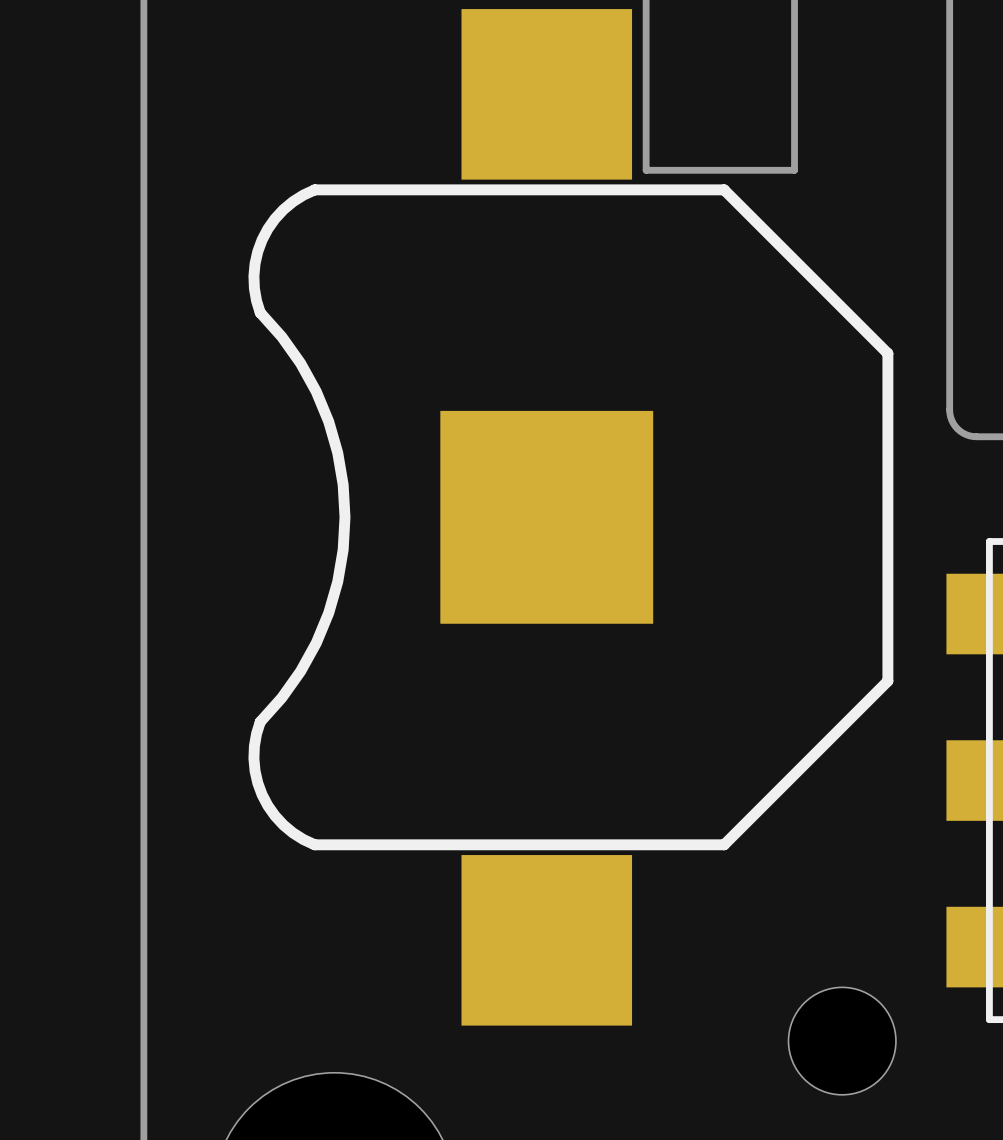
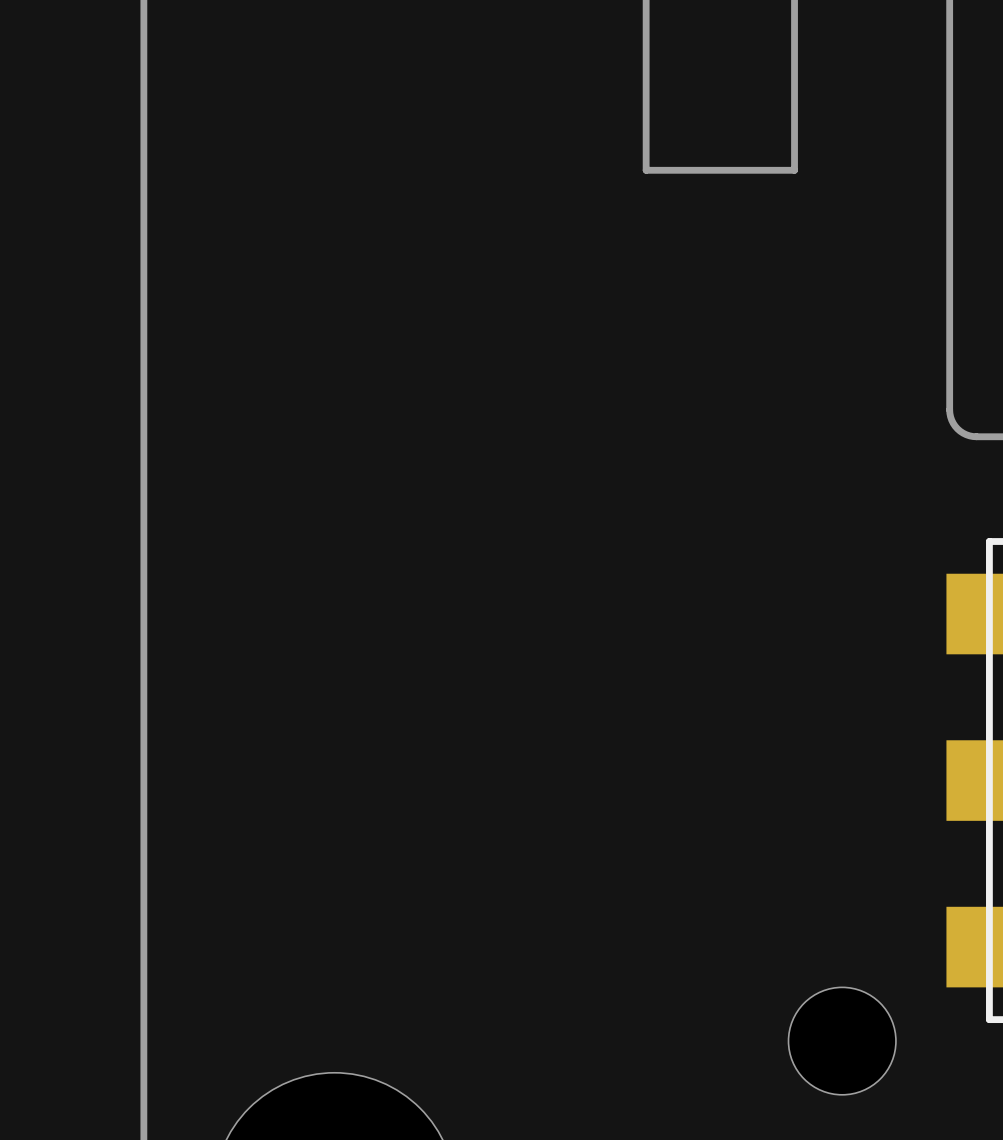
part: (570, 517) -> none

